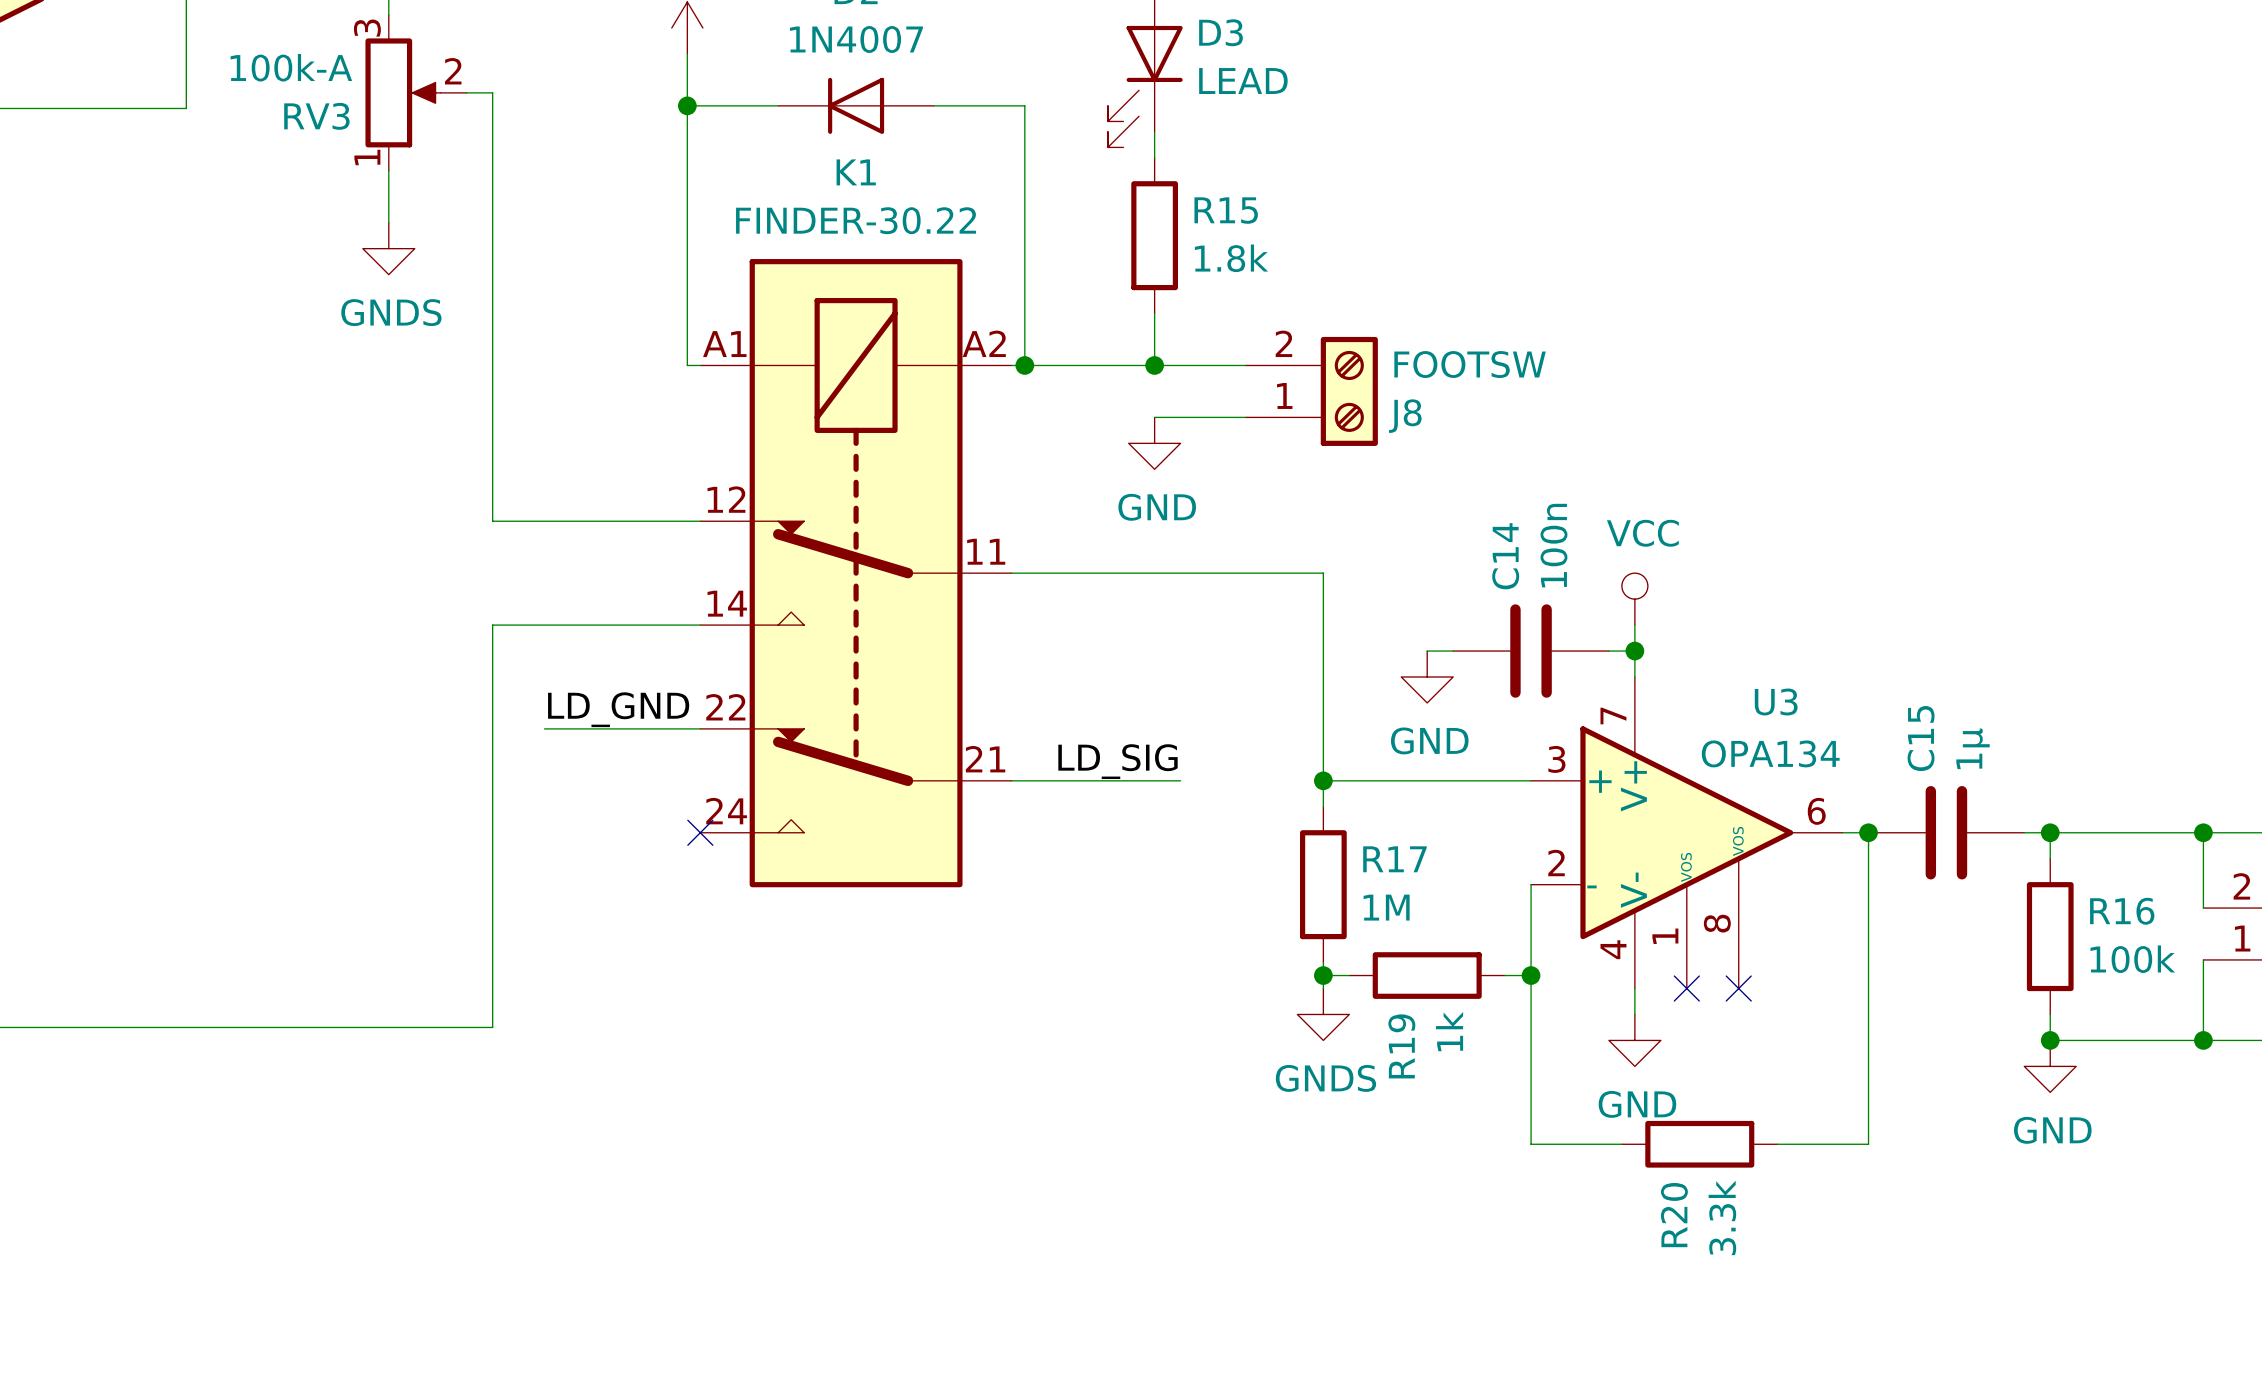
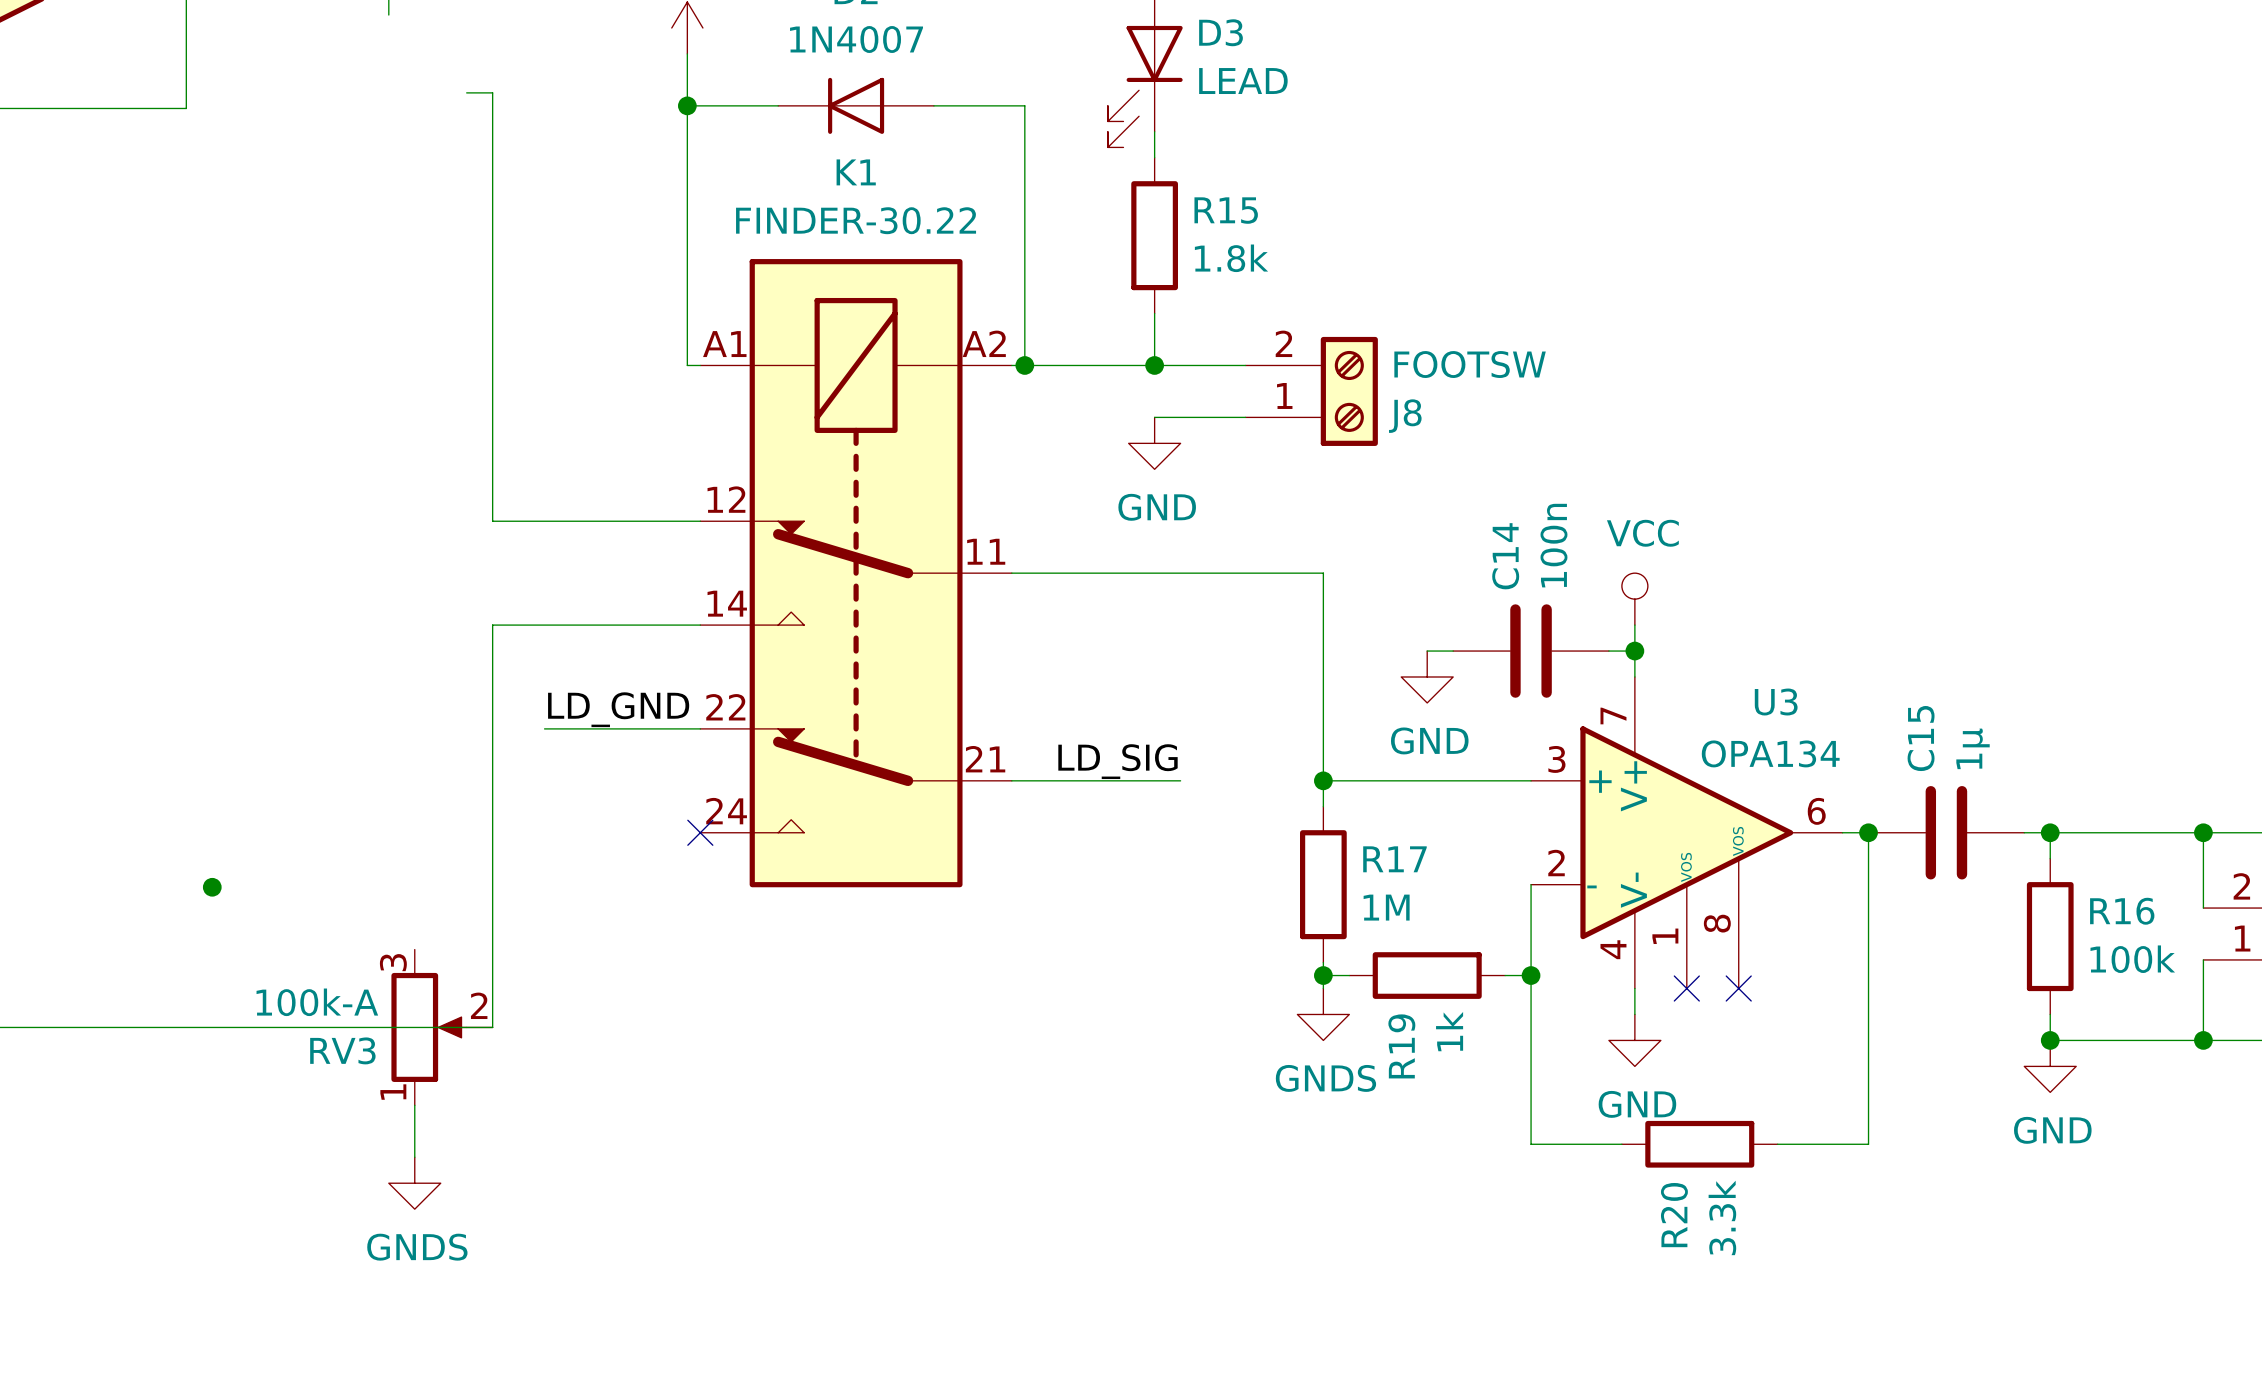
RV3 position: (416, 92) -> (442, 1027)
wire: (388, 170) (388, 222) -> none
power symbol: GNDS (388, 248) -> none
junction: none -> (212, 887)
wire: none -> (414, 1105) (414, 1157)
power symbol: none -> GNDS (414, 1183)

